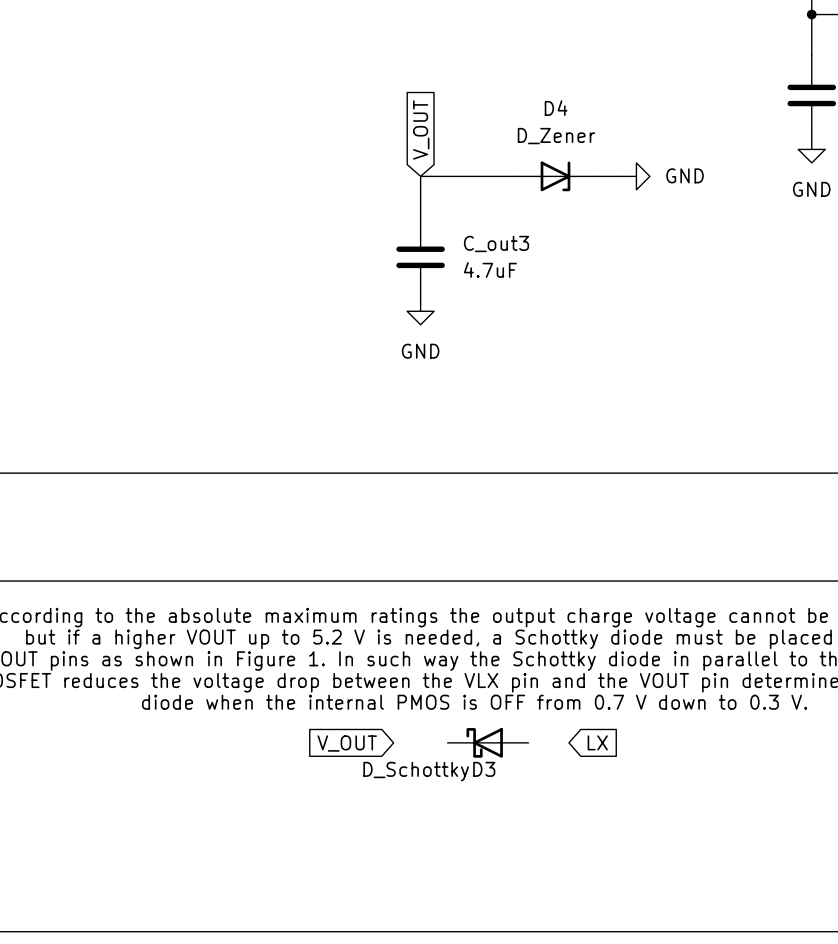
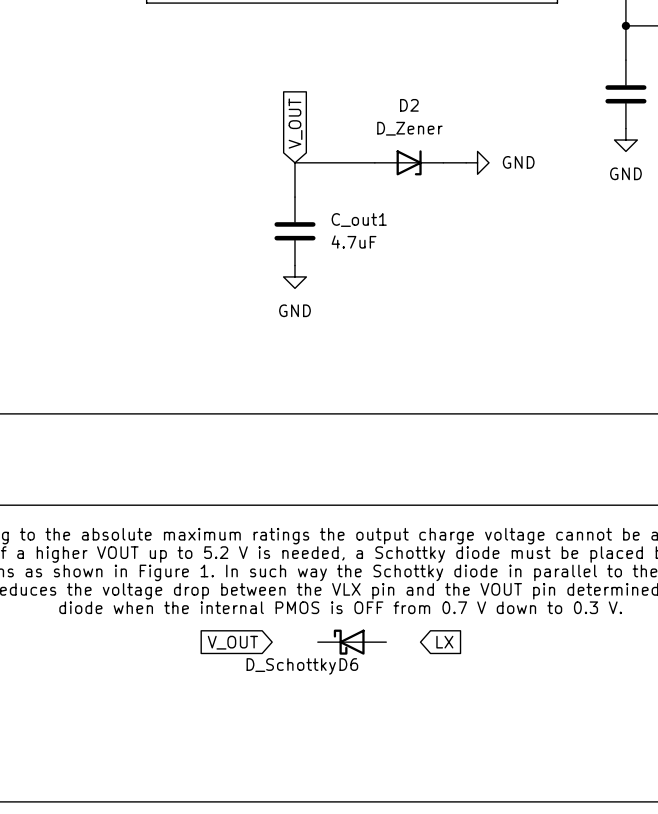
D4 name: D4 (556, 108) -> D2 (409, 105)
C_out3 name: C_out3 (496, 243) -> C_out1 (359, 220)
D3 name: D3 (484, 769) -> D6 (348, 664)

